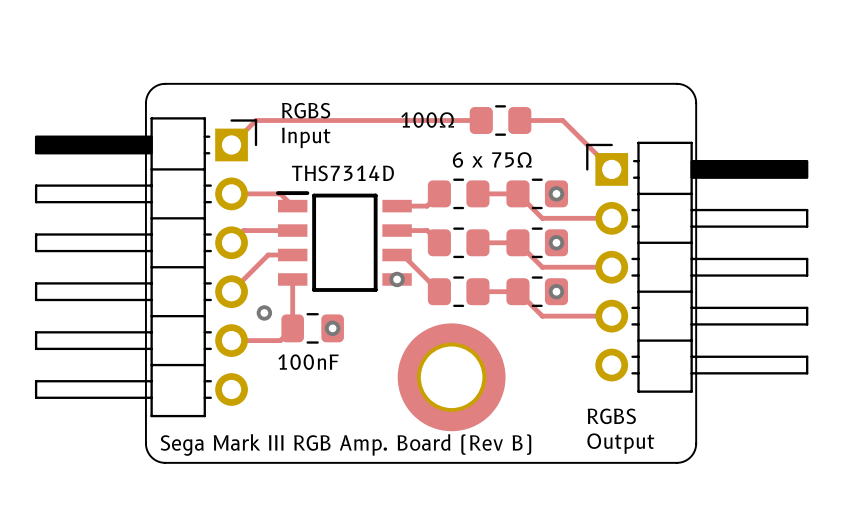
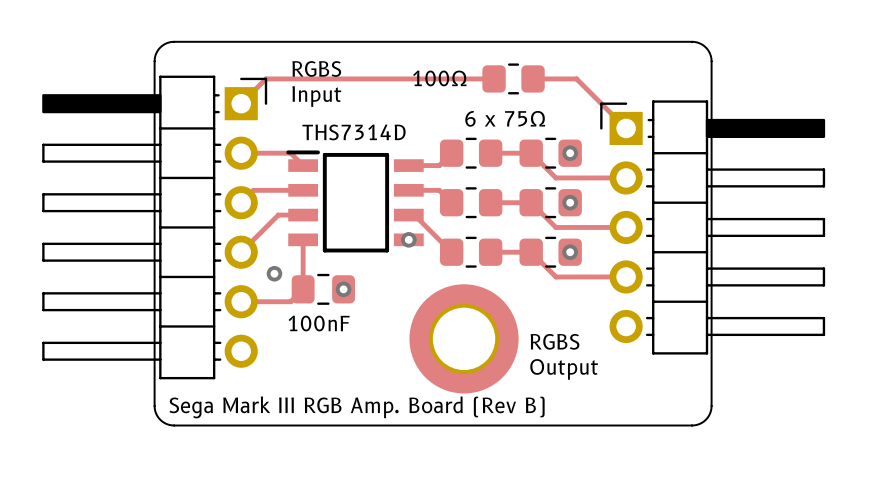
text position: RGBS (611, 416) -> RGBS (554, 341)
text position: Output (620, 443) -> Output (564, 369)

